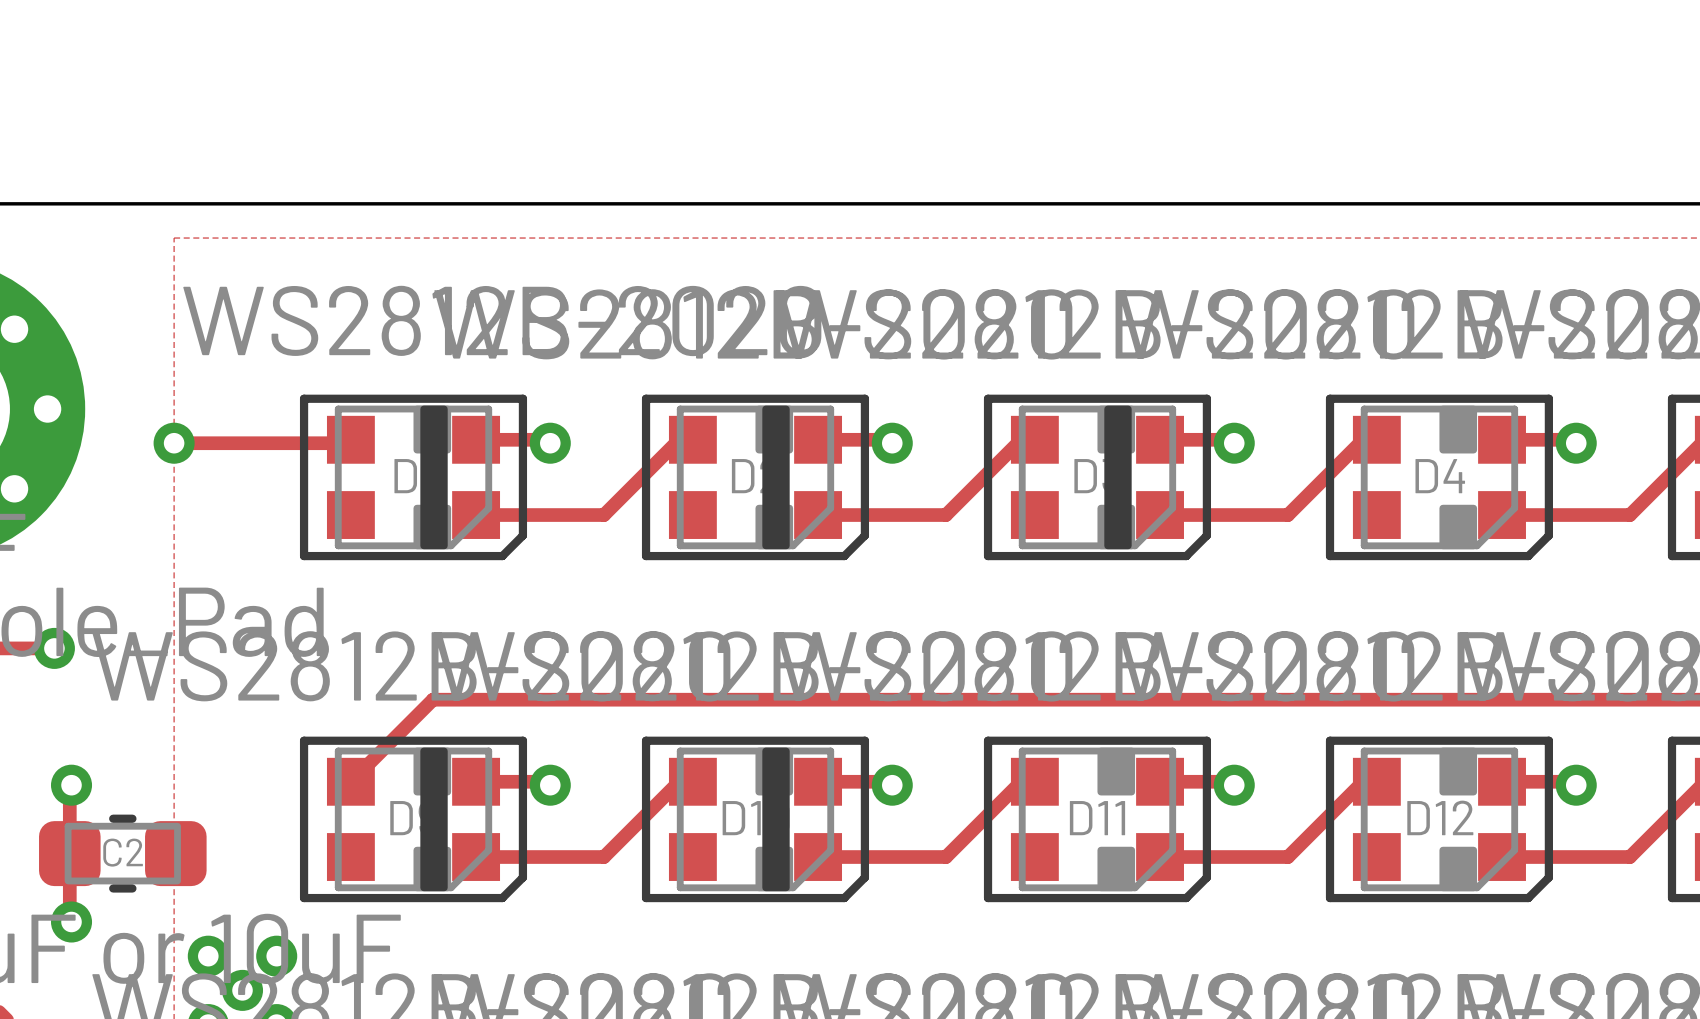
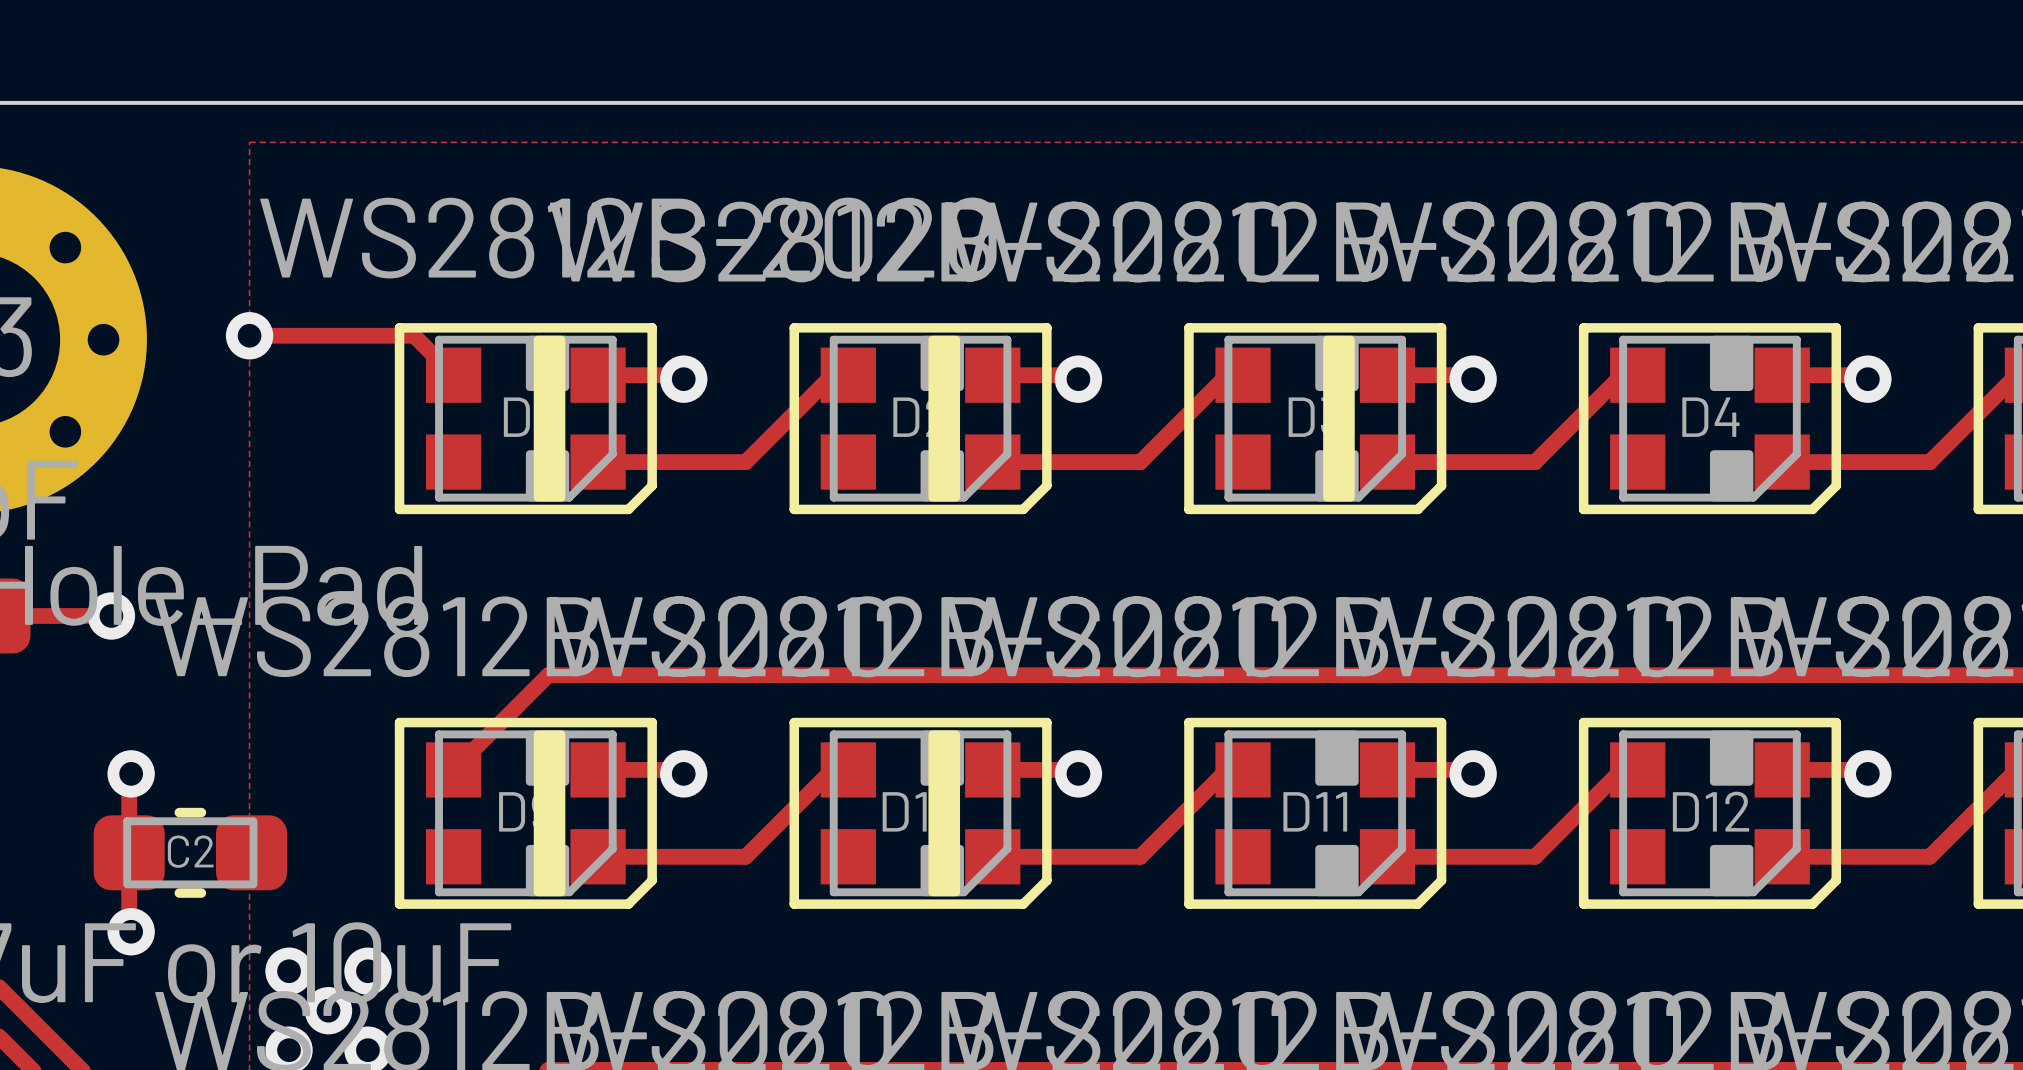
track: (350, 439) (347, 443) (174, 443) -> (453, 375) (414, 335) (249, 335)
via position: (174, 443) -> (249, 335)

